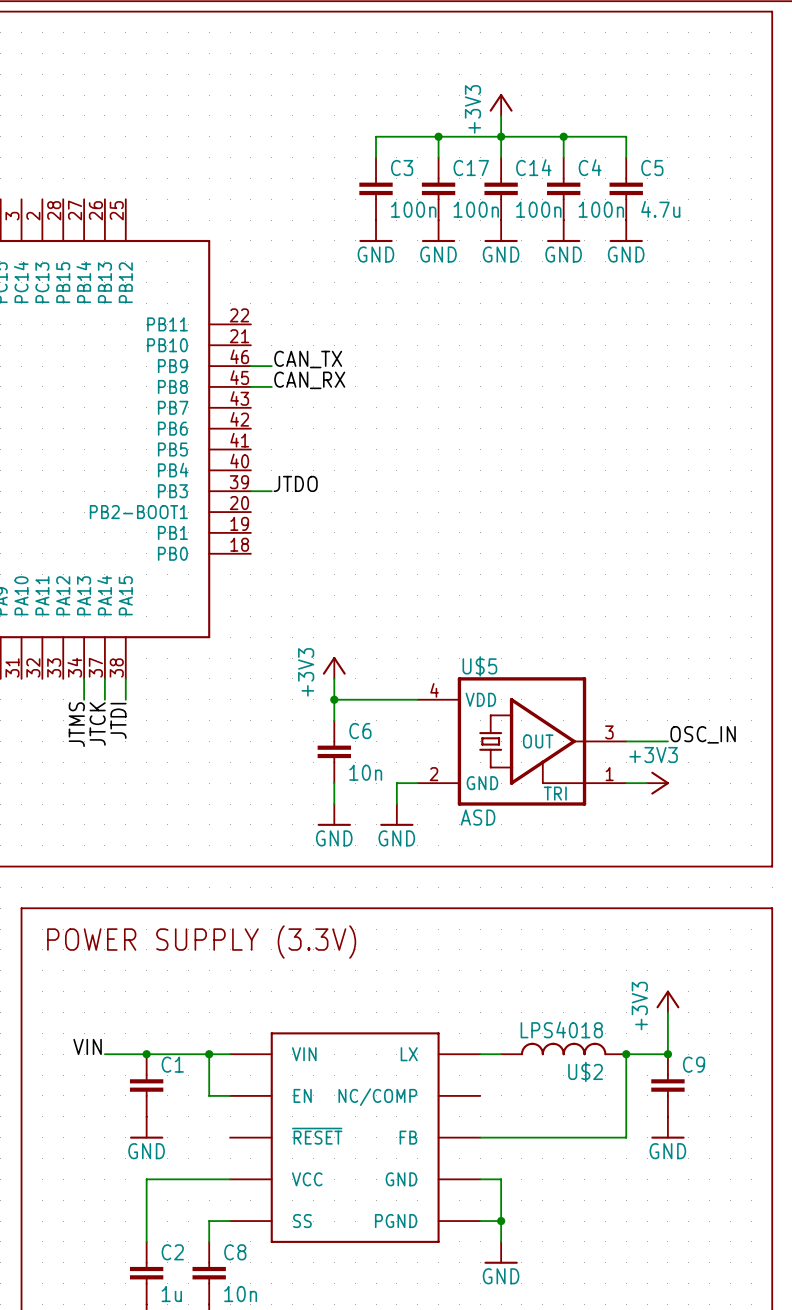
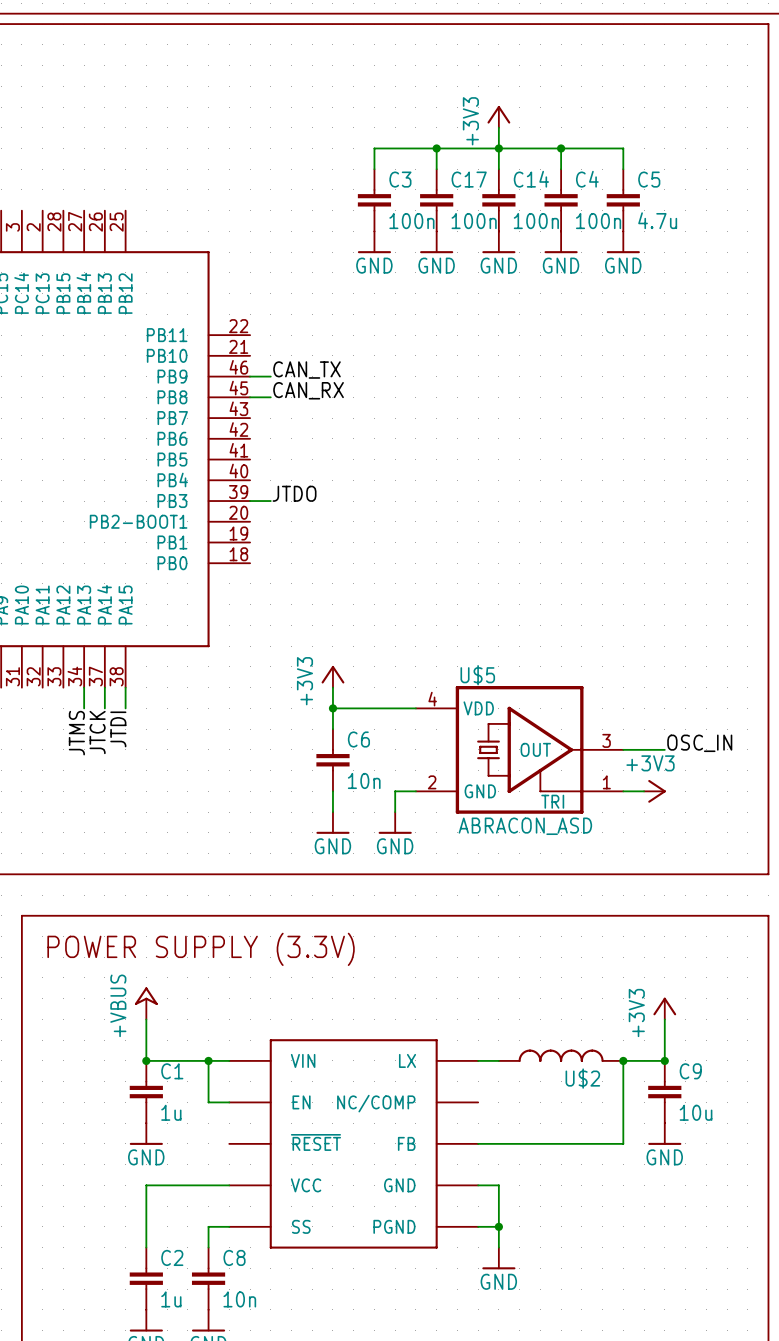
U$5 value: ASD (478, 817) -> ABRACON_ASD (525, 826)
power symbol: none -> +VBUS (146, 1003)
U$2 value: LPS4018 (561, 1029) -> none
label: VIN (87, 1046) -> none
wire: (104, 1054) (146, 1054) -> (146, 1019) (146, 1060)
C1 value: none -> 1u (171, 1112)
C9 value: none -> 10u (696, 1112)

